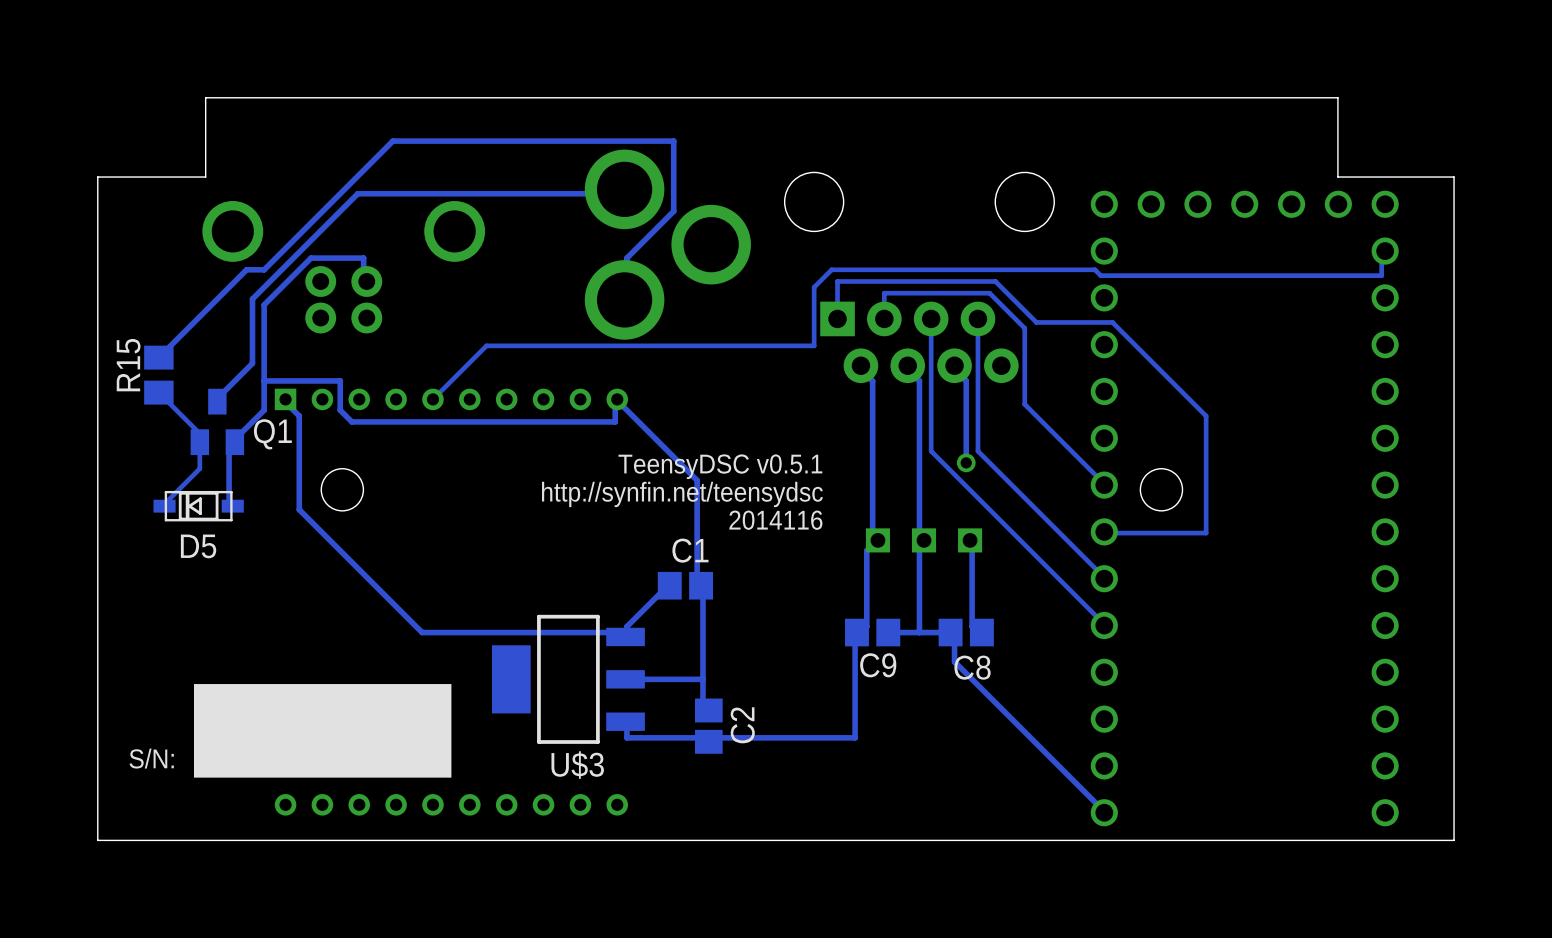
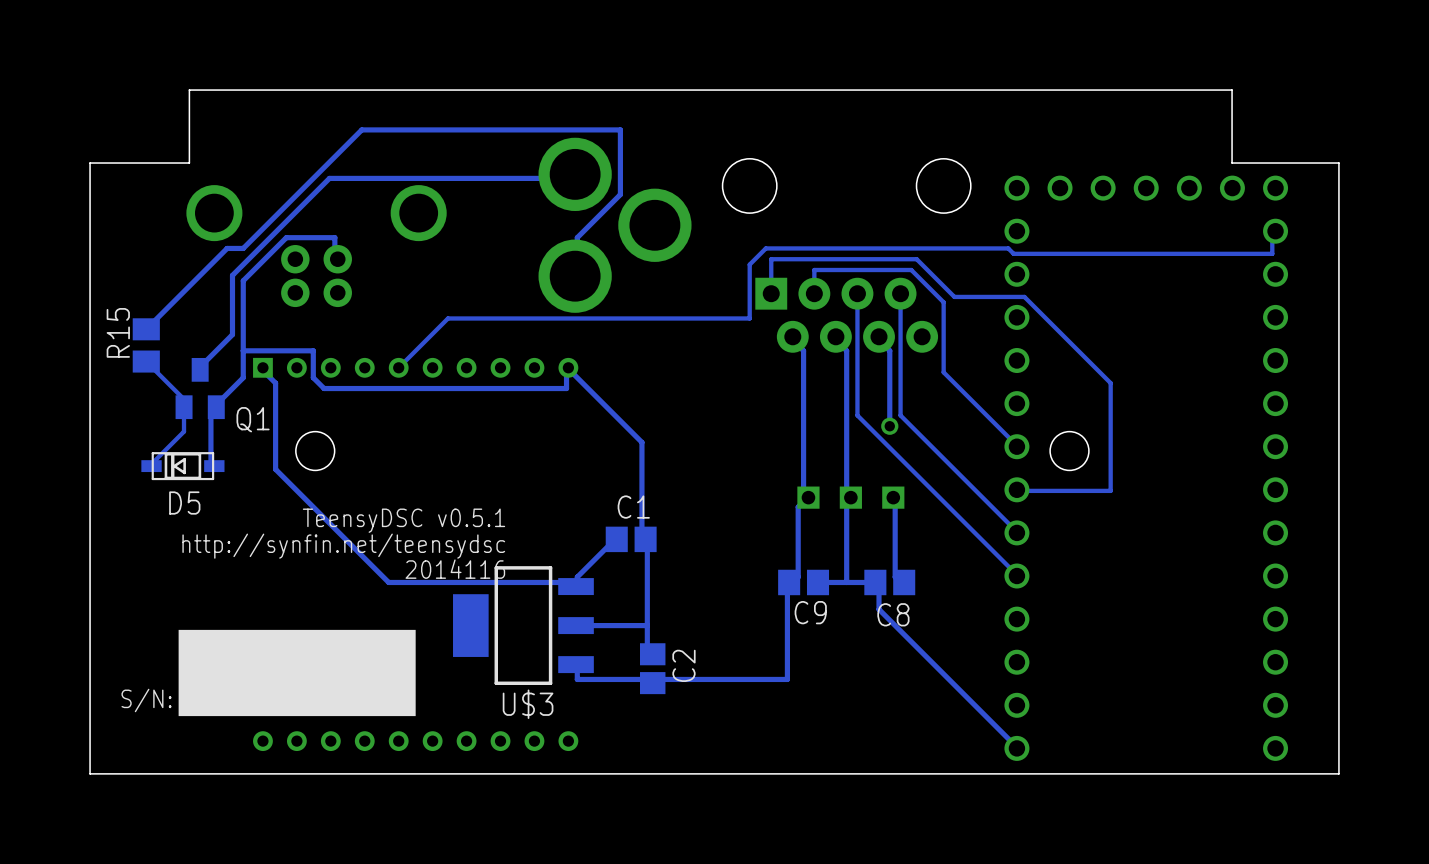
Q1 name position: Q1 (272, 434) -> Q1 (253, 419)
text position: TeensyDSC v0.5.1 (720, 466) -> TeensyDSC v0.5.1 (403, 520)
text position: http://synfin.net/teensydsc (682, 494) -> http://synfin.net/teensydsc (343, 546)
text position: 2014116 (775, 520) -> 2014116 (455, 569)

